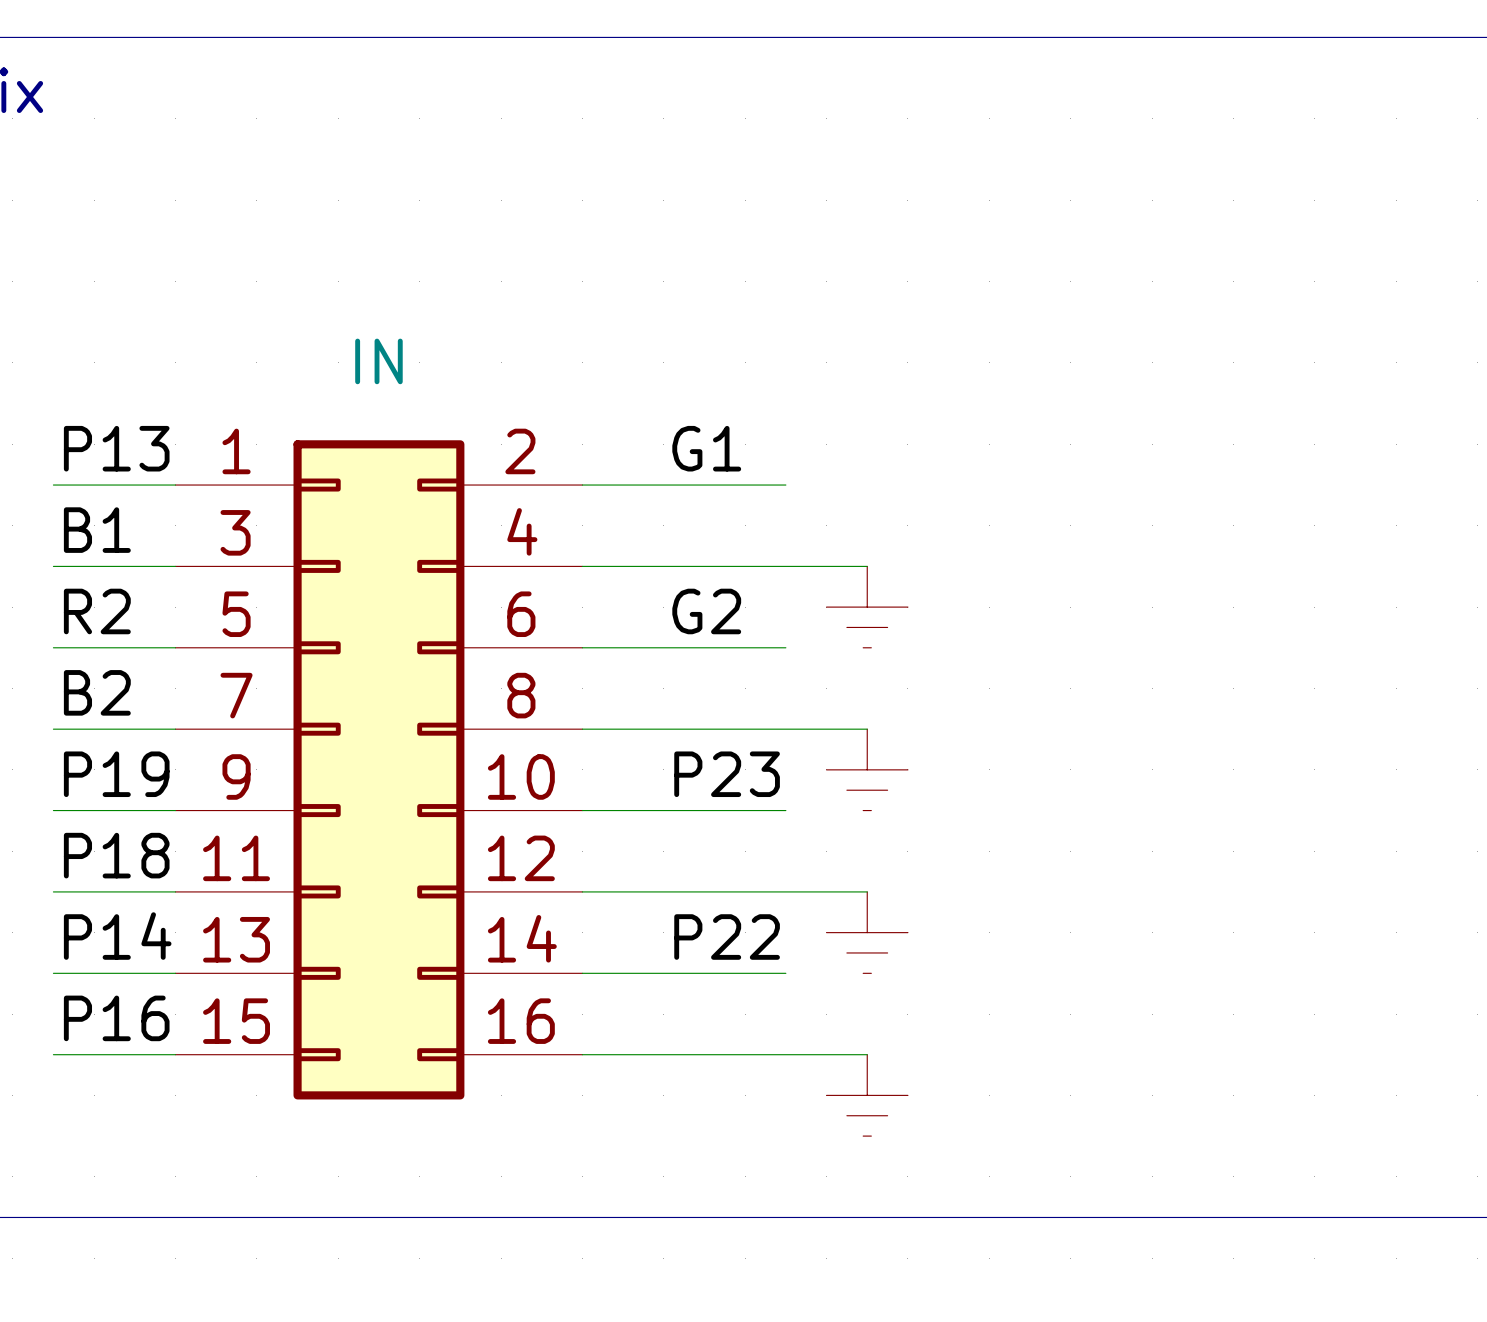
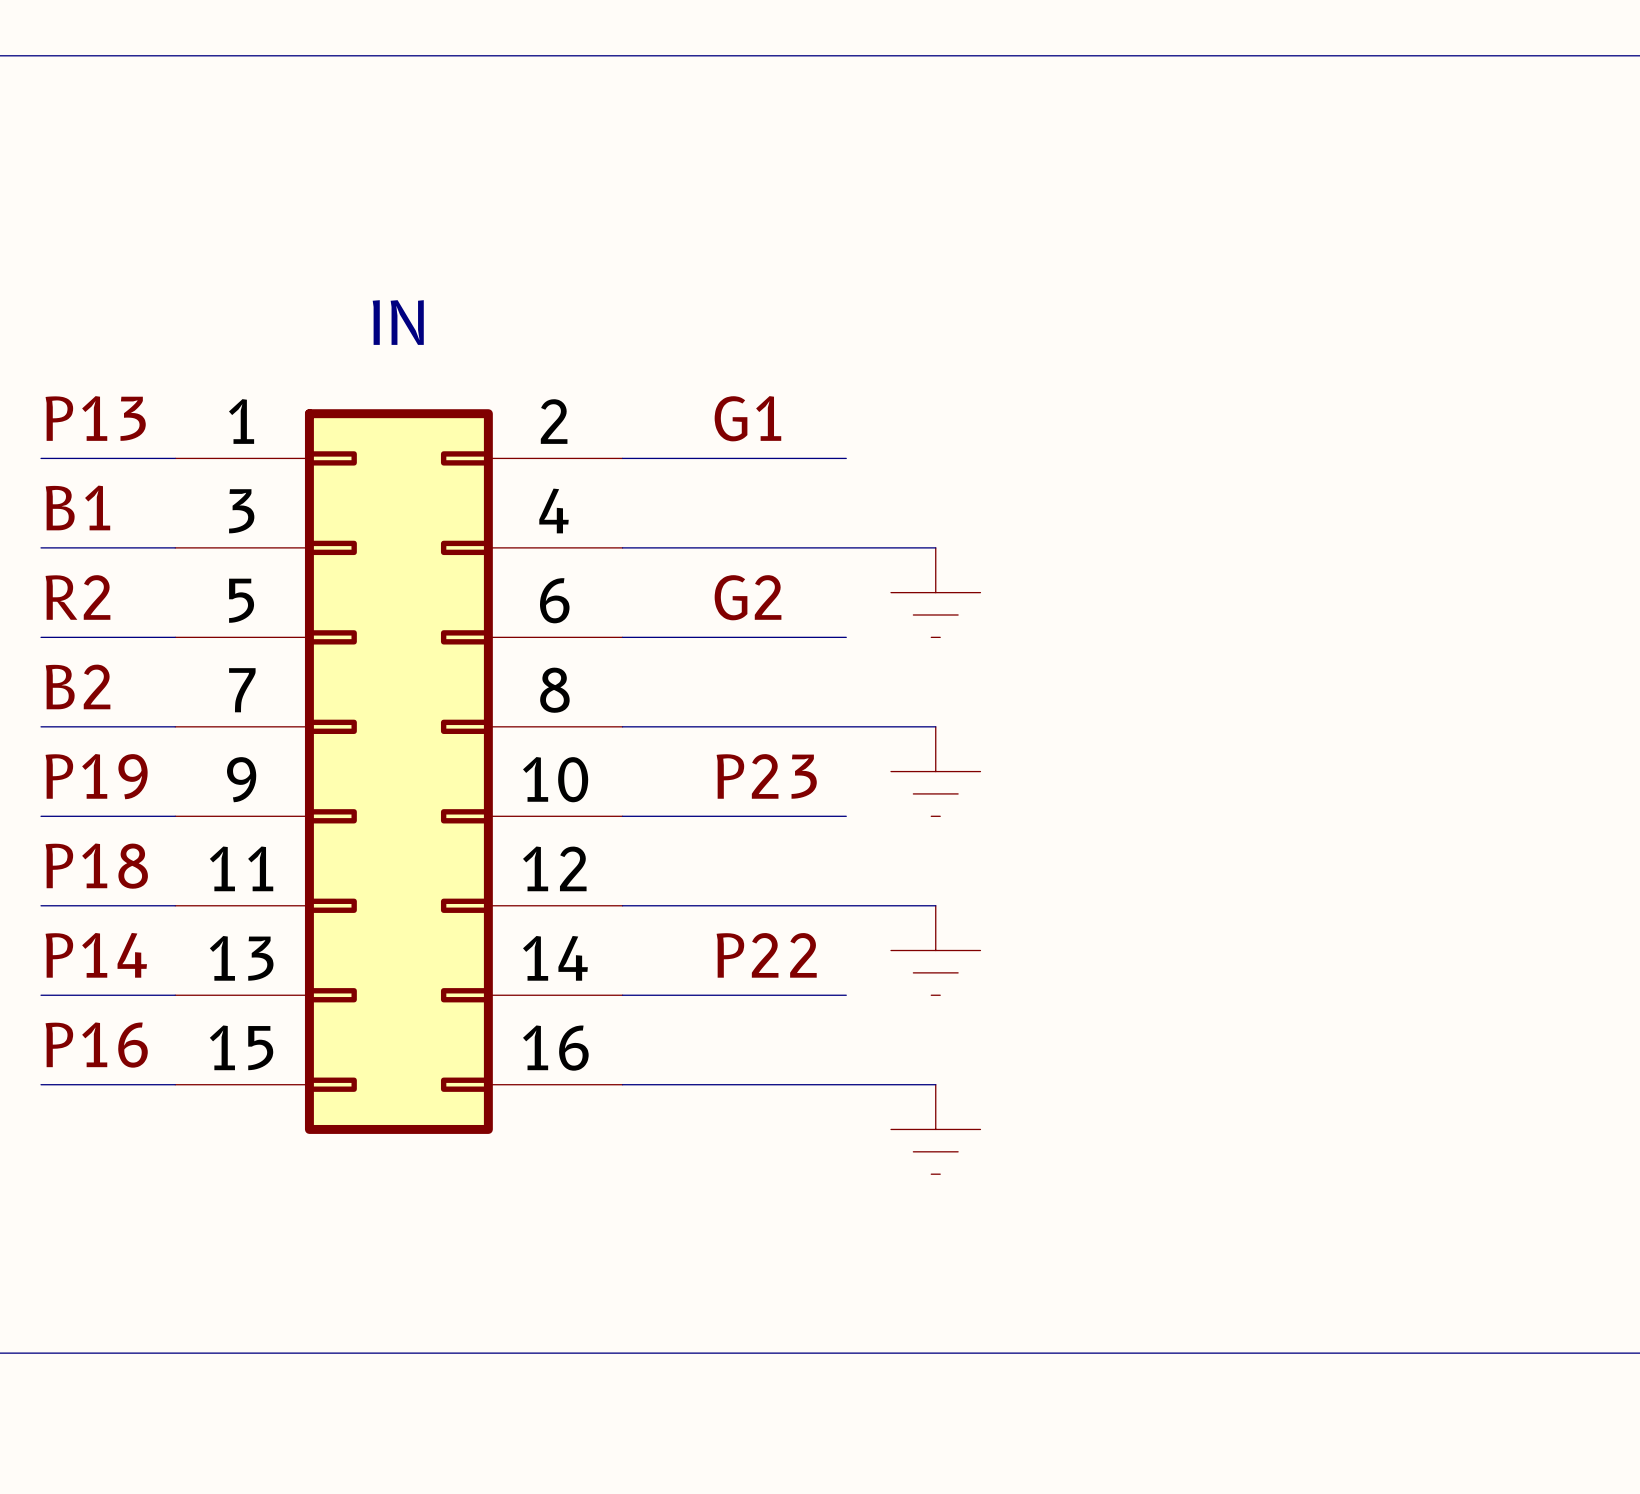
label: none -> P13 (95, 418)
wire: none -> (622, 458) (846, 458)
label: P13 (116, 448) -> B1 (77, 507)
label position: G1 (706, 448) -> G1 (747, 418)
power symbol: none -> (935, 592)
label: B1 (97, 530) -> R2 (77, 597)
wire: (785, 566) (867, 566) -> (846, 547) (935, 547)
power symbol: (867, 607) -> none
label: R2 (97, 611) -> B2 (78, 686)
label position: G2 (706, 611) -> G2 (748, 597)
power symbol: none -> (935, 771)
label: B2 (97, 692) -> P19 (96, 776)
wire: (785, 729) (867, 729) -> (846, 726) (935, 726)
part position: (378, 769) -> (398, 771)
power symbol: (867, 769) -> none
label: P19 (116, 774) -> P18 (96, 866)
label position: P23 (727, 774) -> P23 (766, 776)
wire: none -> (846, 905) (935, 905)
power symbol: none -> (935, 950)
label: P18 (116, 855) -> P14 (96, 955)
wire: (785, 891) (867, 891) -> (846, 1084) (935, 1084)
power symbol: (867, 932) -> none
label: P14 (117, 936) -> P16 (96, 1045)
label position: P22 (727, 937) -> P22 (766, 955)
power symbol: none -> (935, 1129)
label: P16 (116, 1018) -> none
wire: (53, 1054) (175, 1054) -> (41, 458) (175, 458)
wire: (582, 1054) (867, 1054) -> none
power symbol: (867, 1095) -> none

